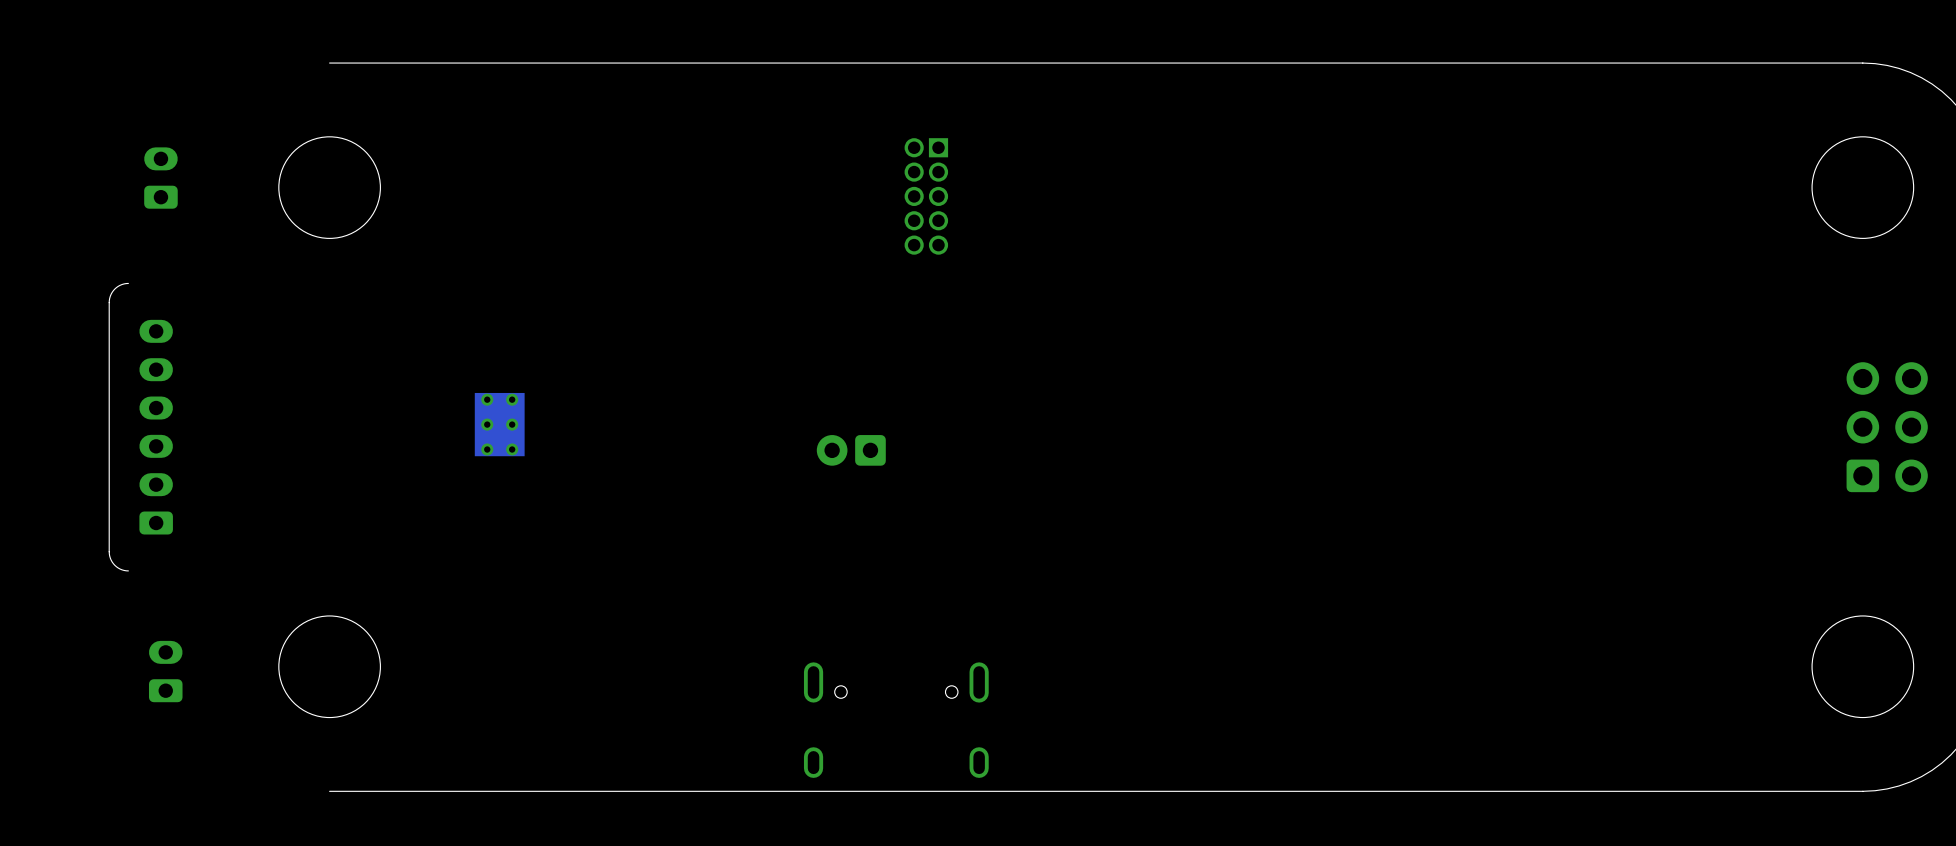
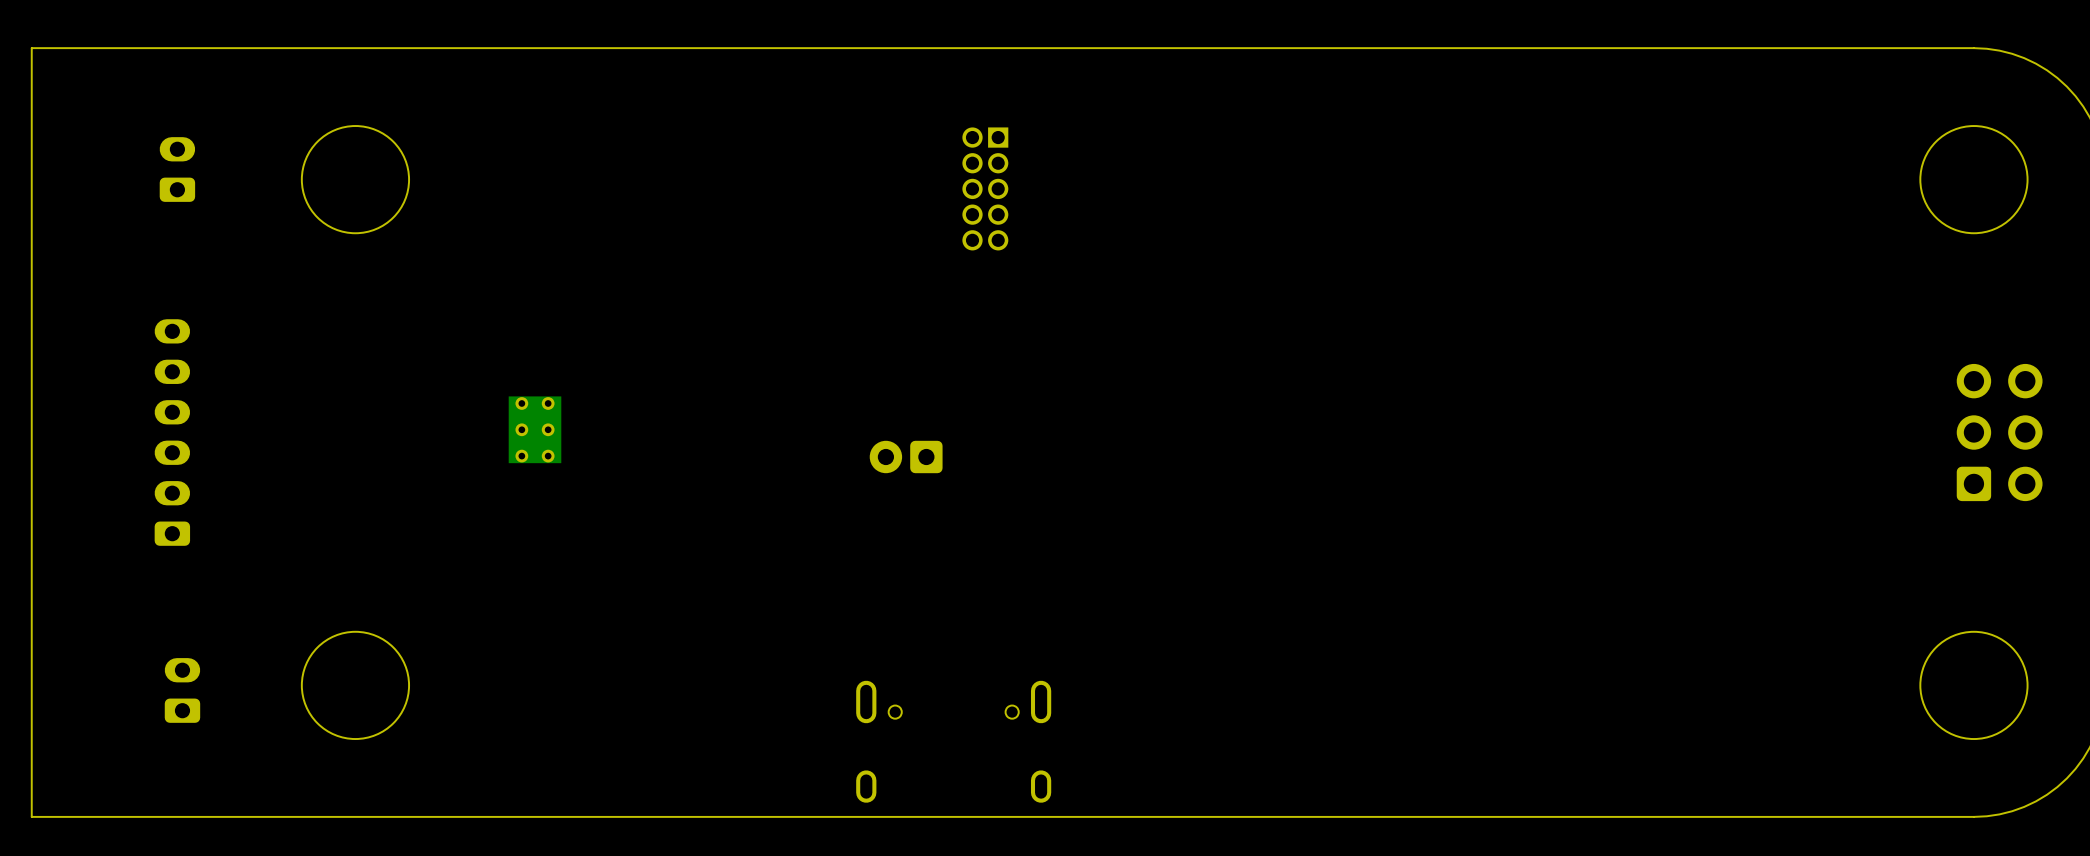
board edge: none -> (355, 48) (31, 48) (31, 816) (355, 816)
board edge: (128, 283) (114, 289) (109, 302) (109, 553) (114, 565) (128, 570) -> none

